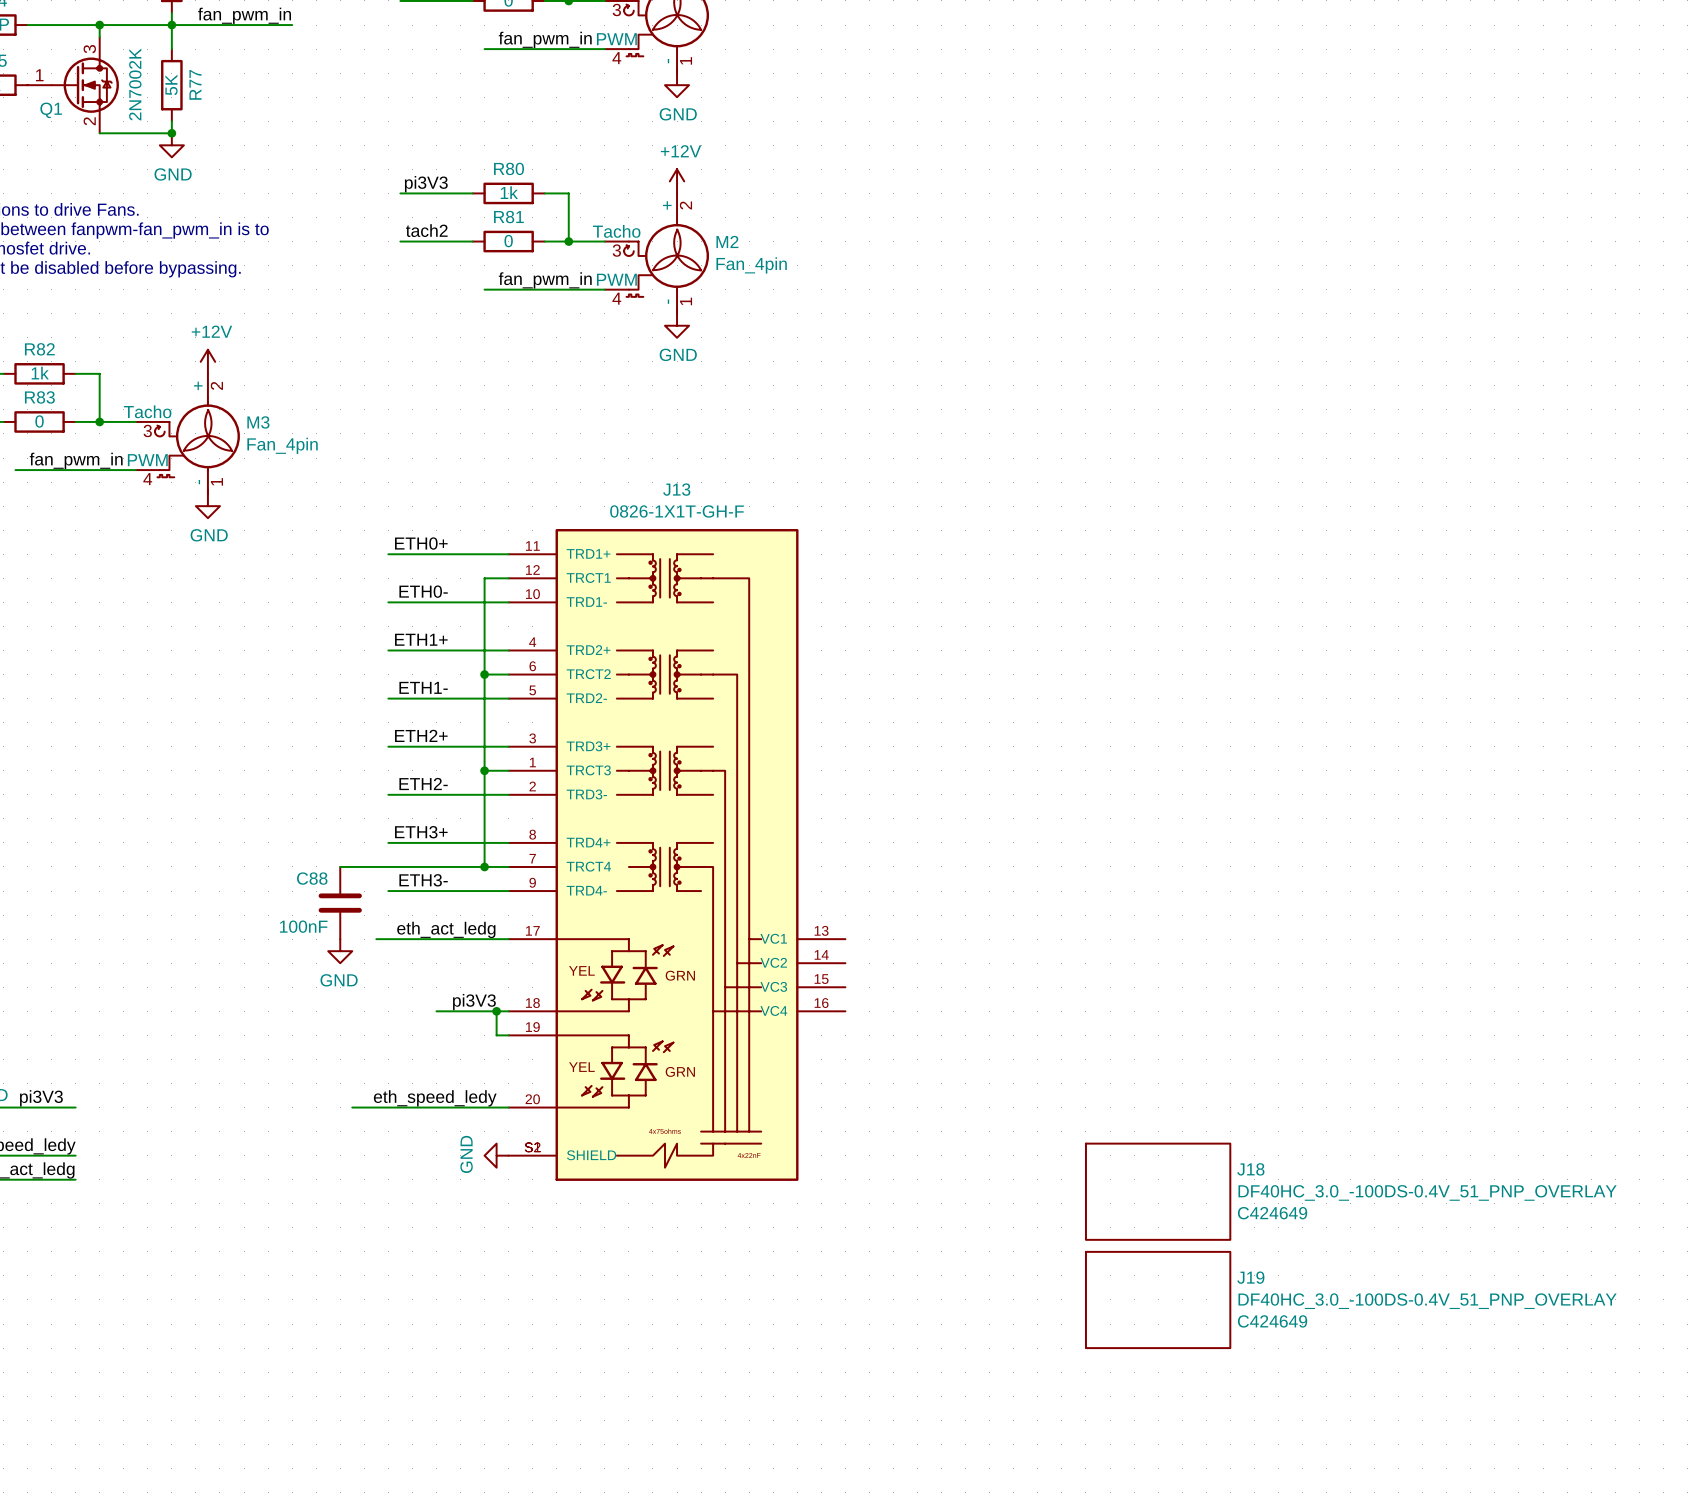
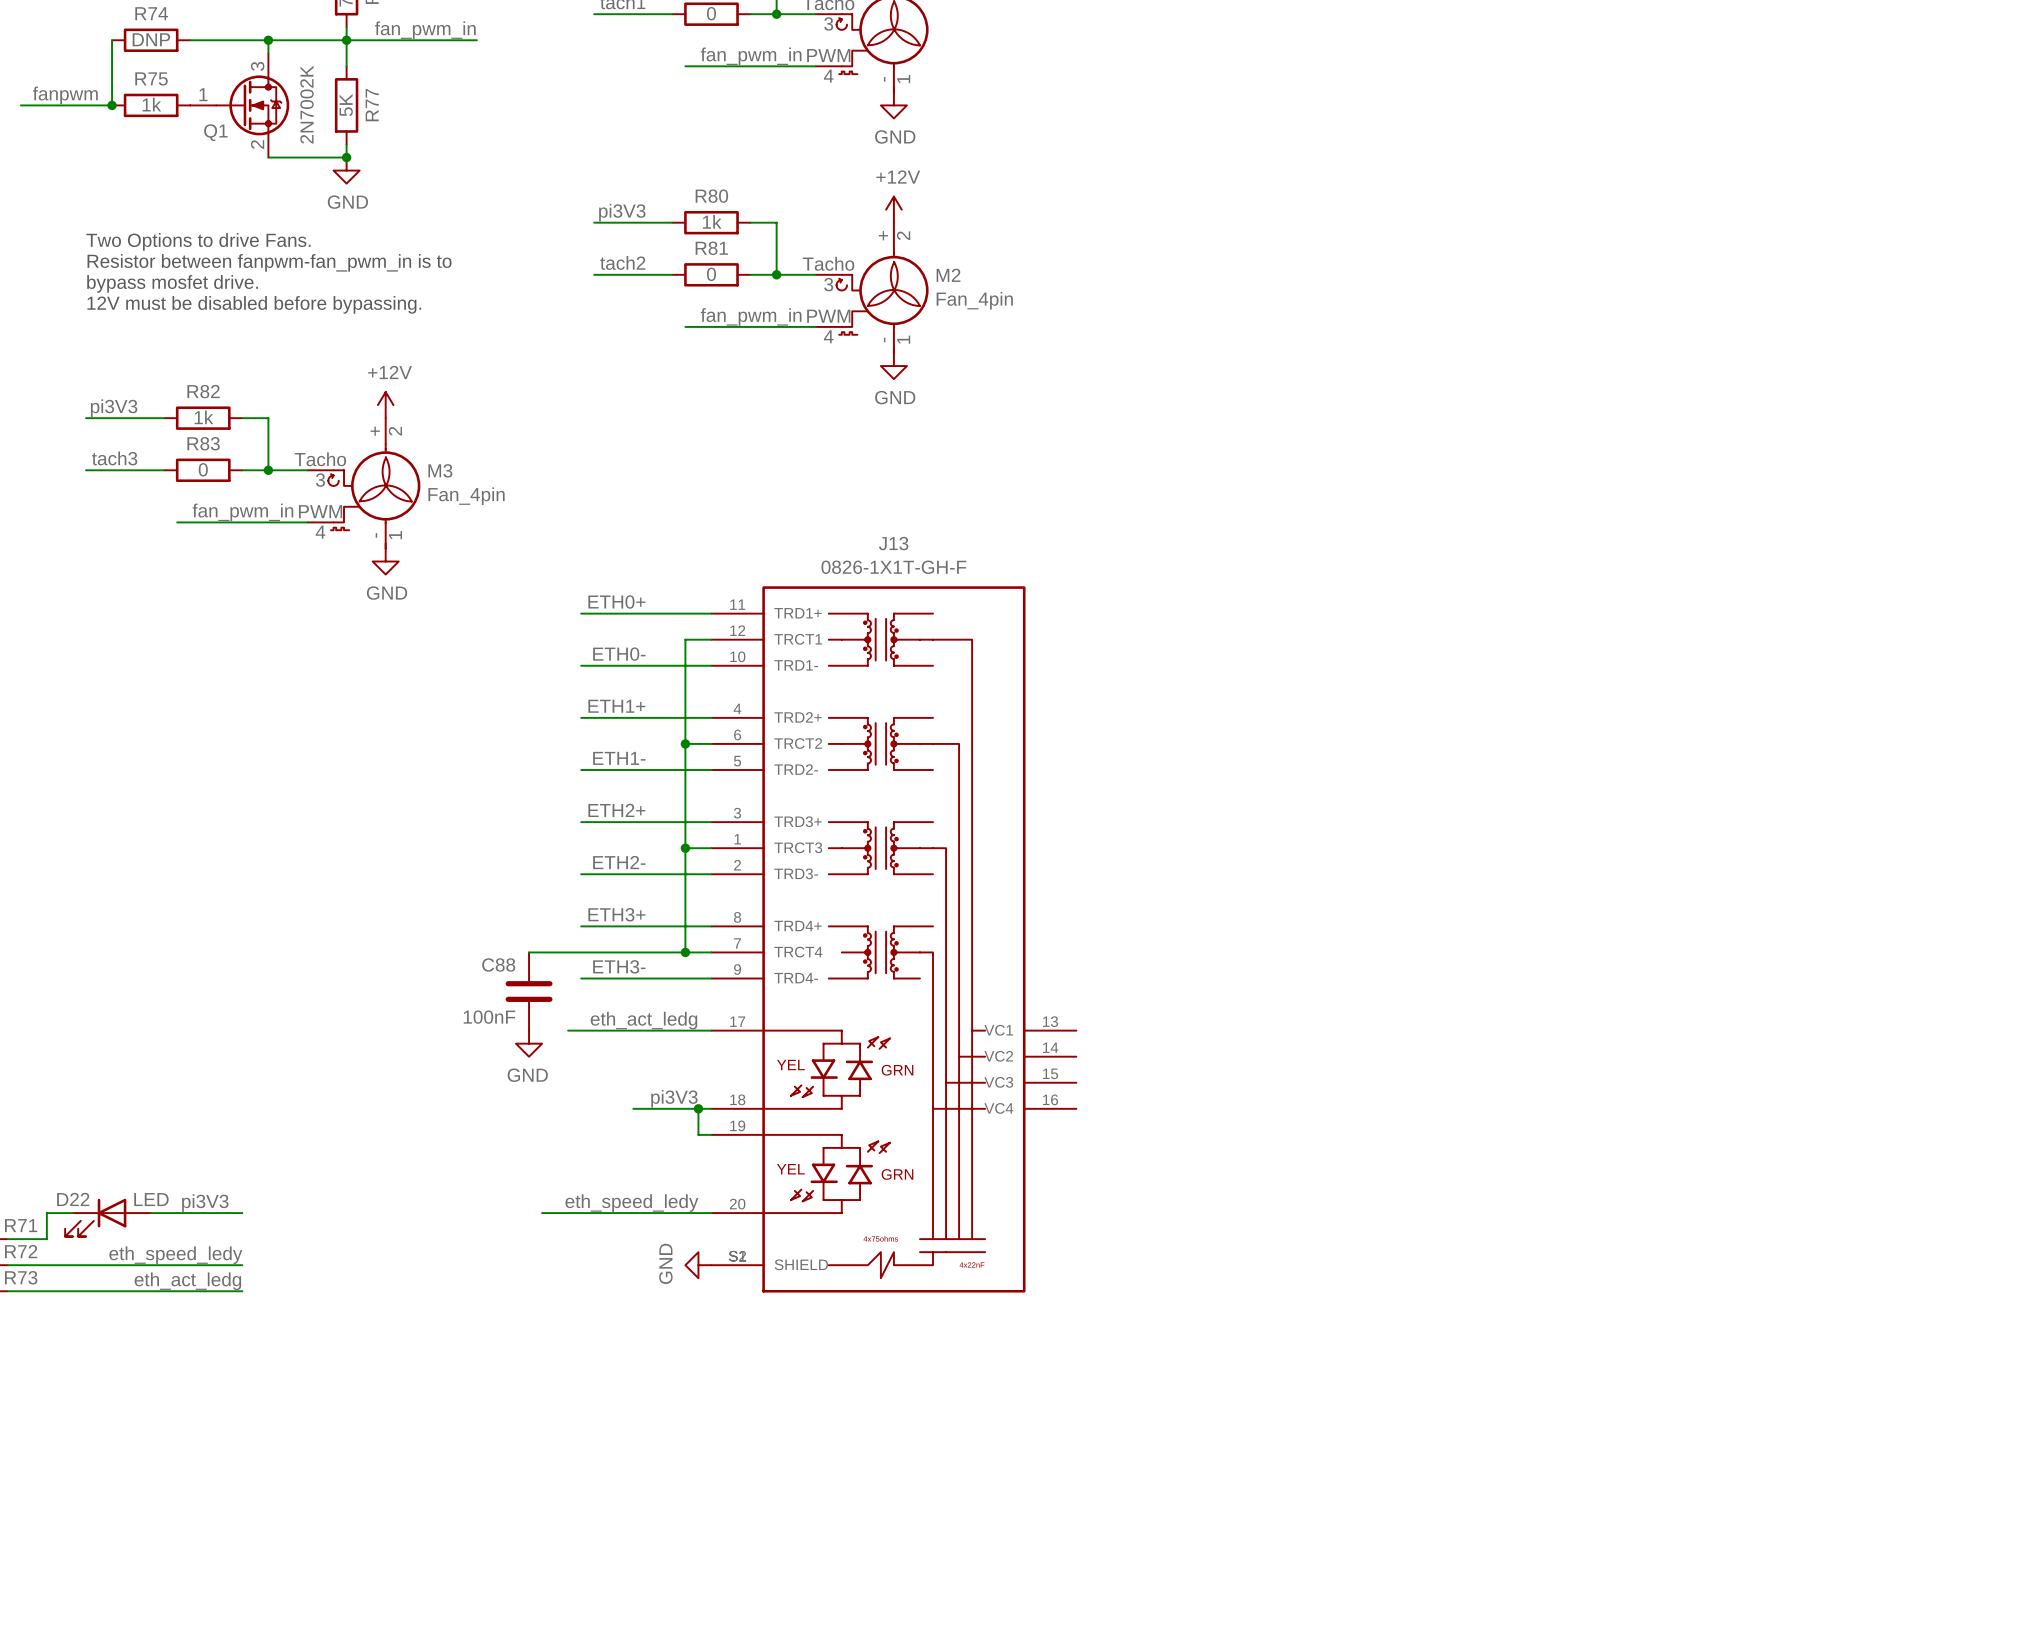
J18: DF40HC_3.0_-100DS-0.4V_51_PNP_OVERLAY (1158, 1191) -> none
J19: DF40HC_3.0_-100DS-0.4V_51_PNP_OVERLAY (1158, 1299) -> none

